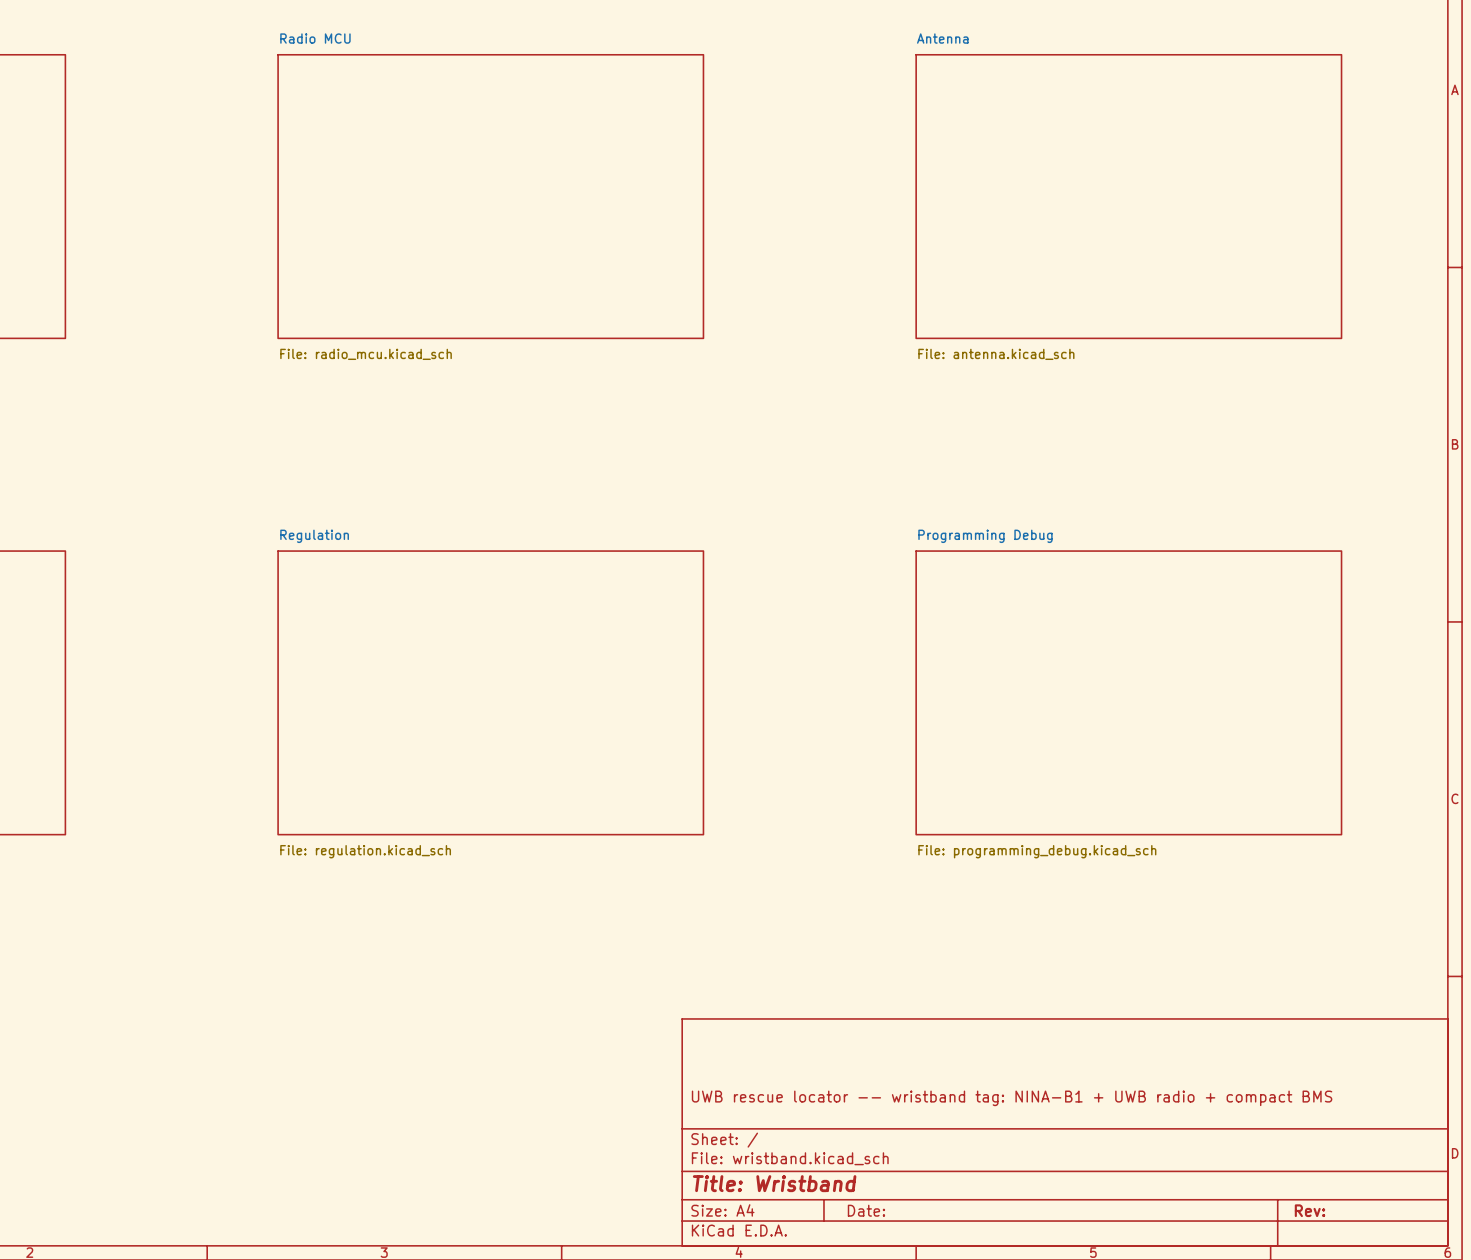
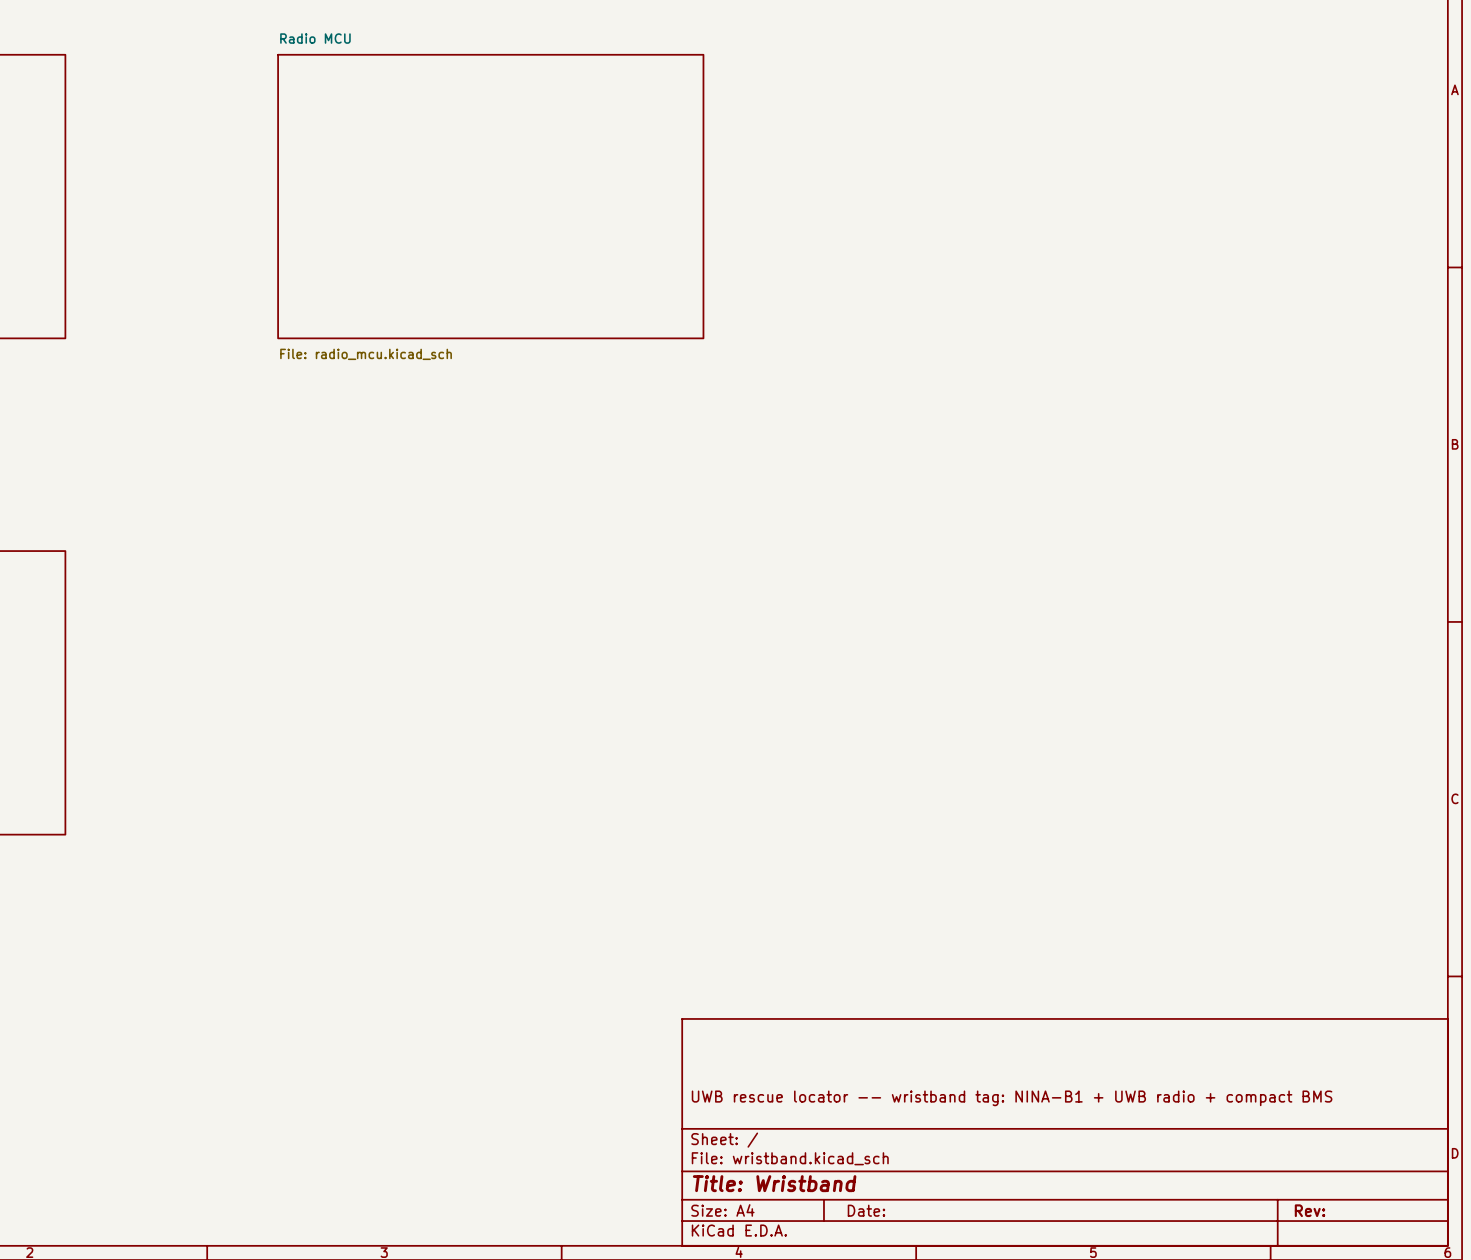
sheet Antenna: File: antenna.kicad_sch (1128, 196) -> none
sheet Regulation: File: regulation.kicad_sch (490, 692) -> none
sheet Programming Debug: File: programming_debug.kicad_sch (1128, 692) -> none

